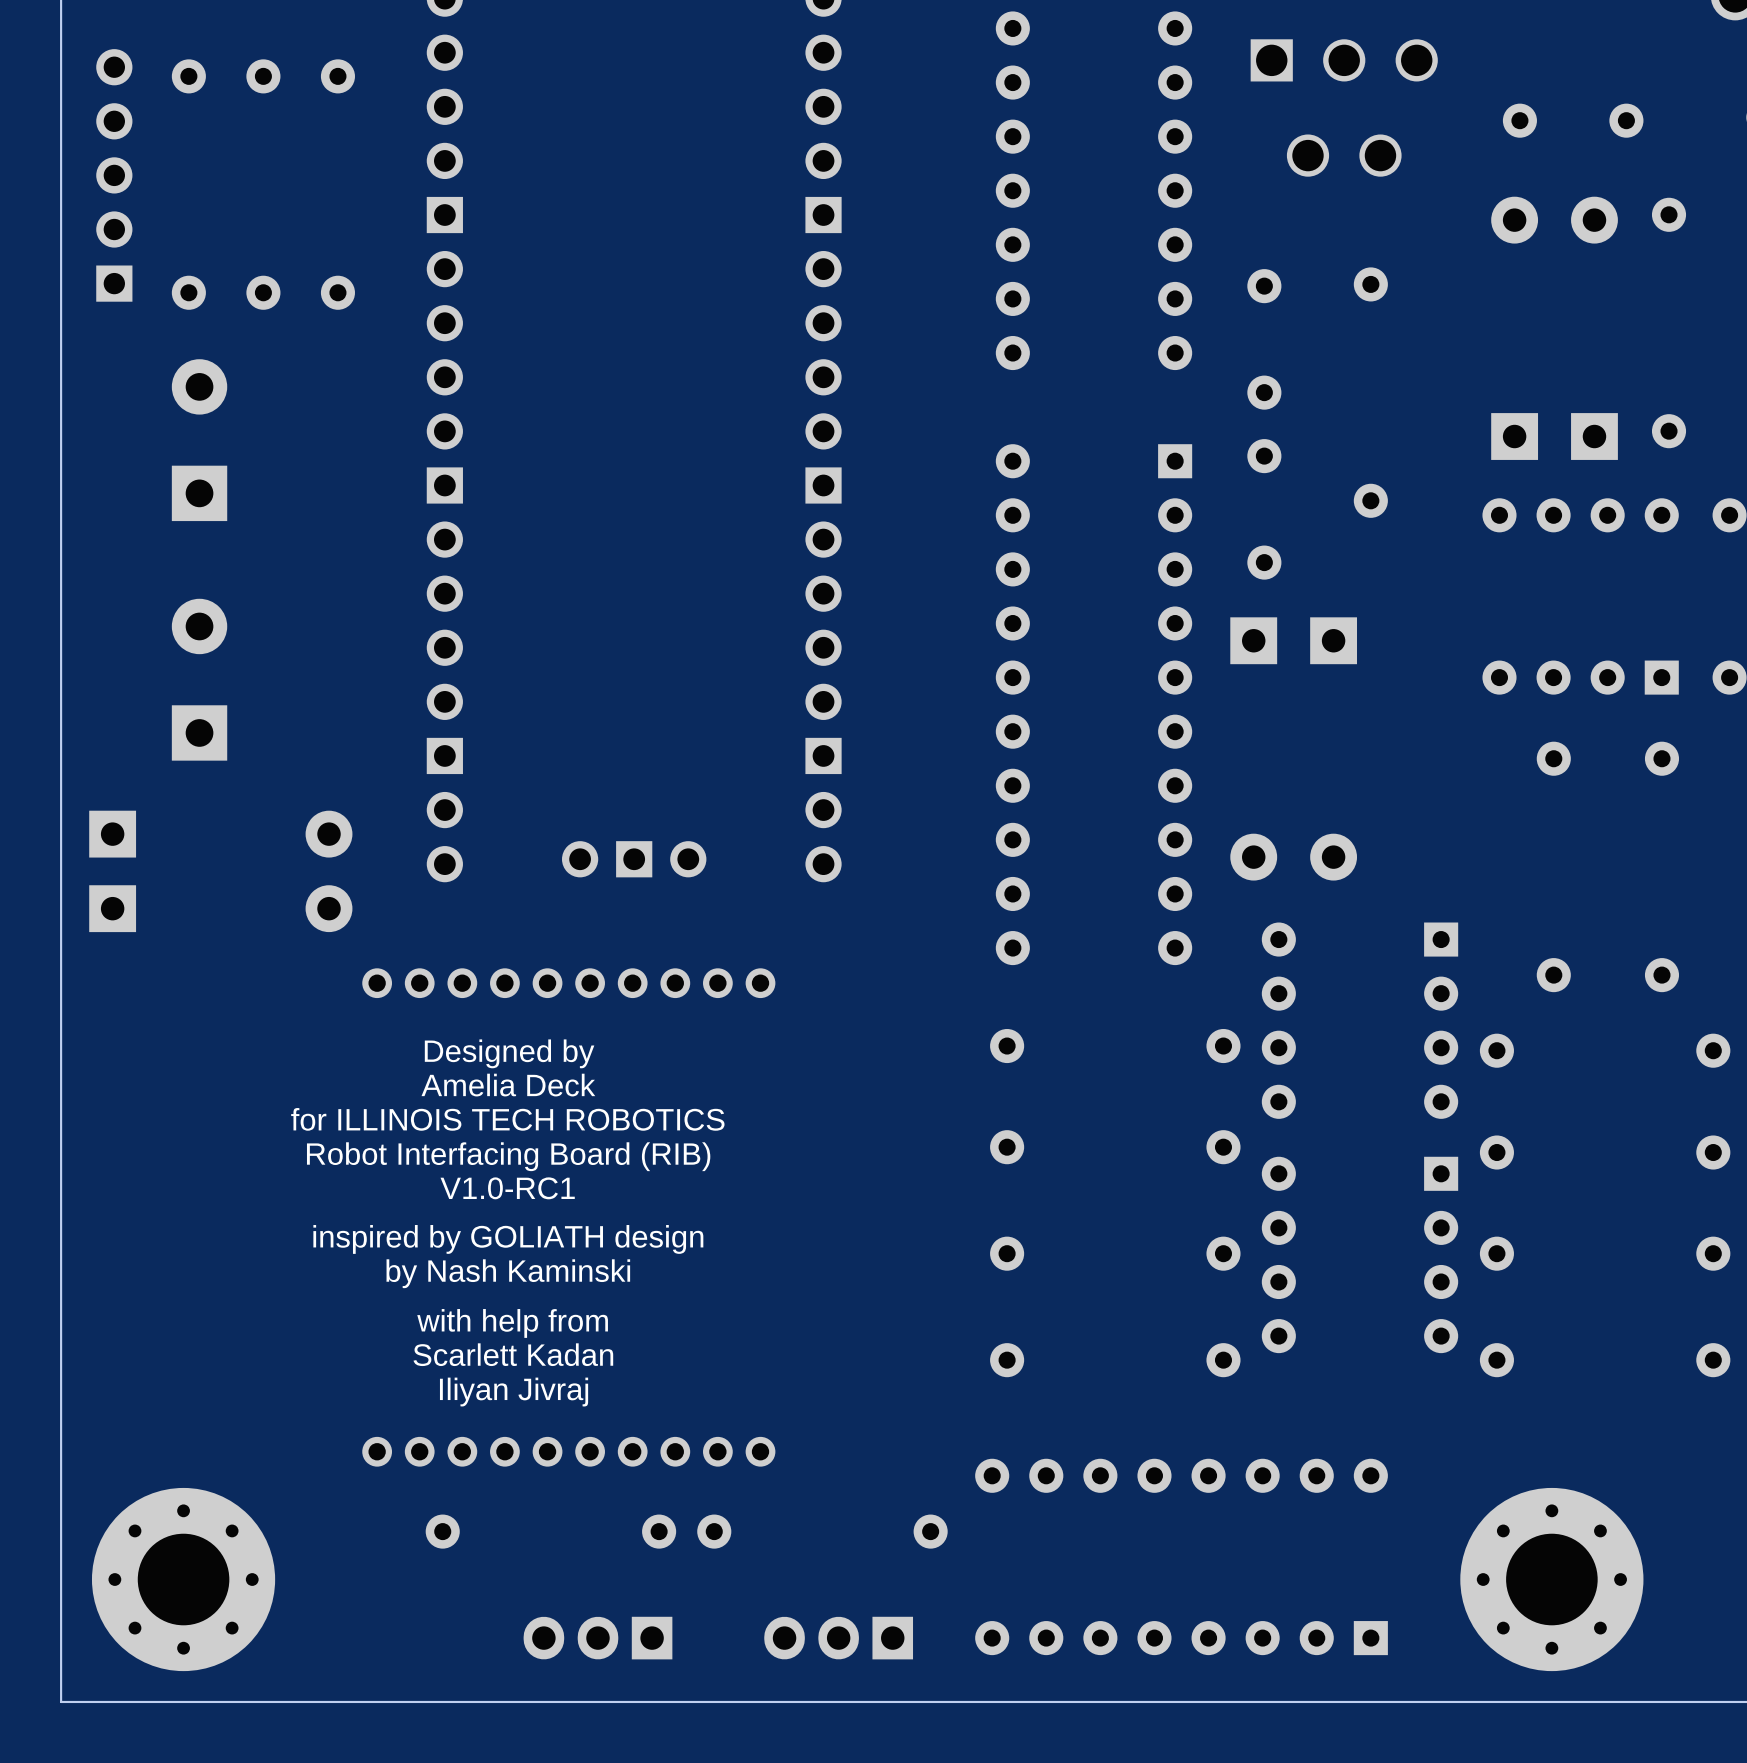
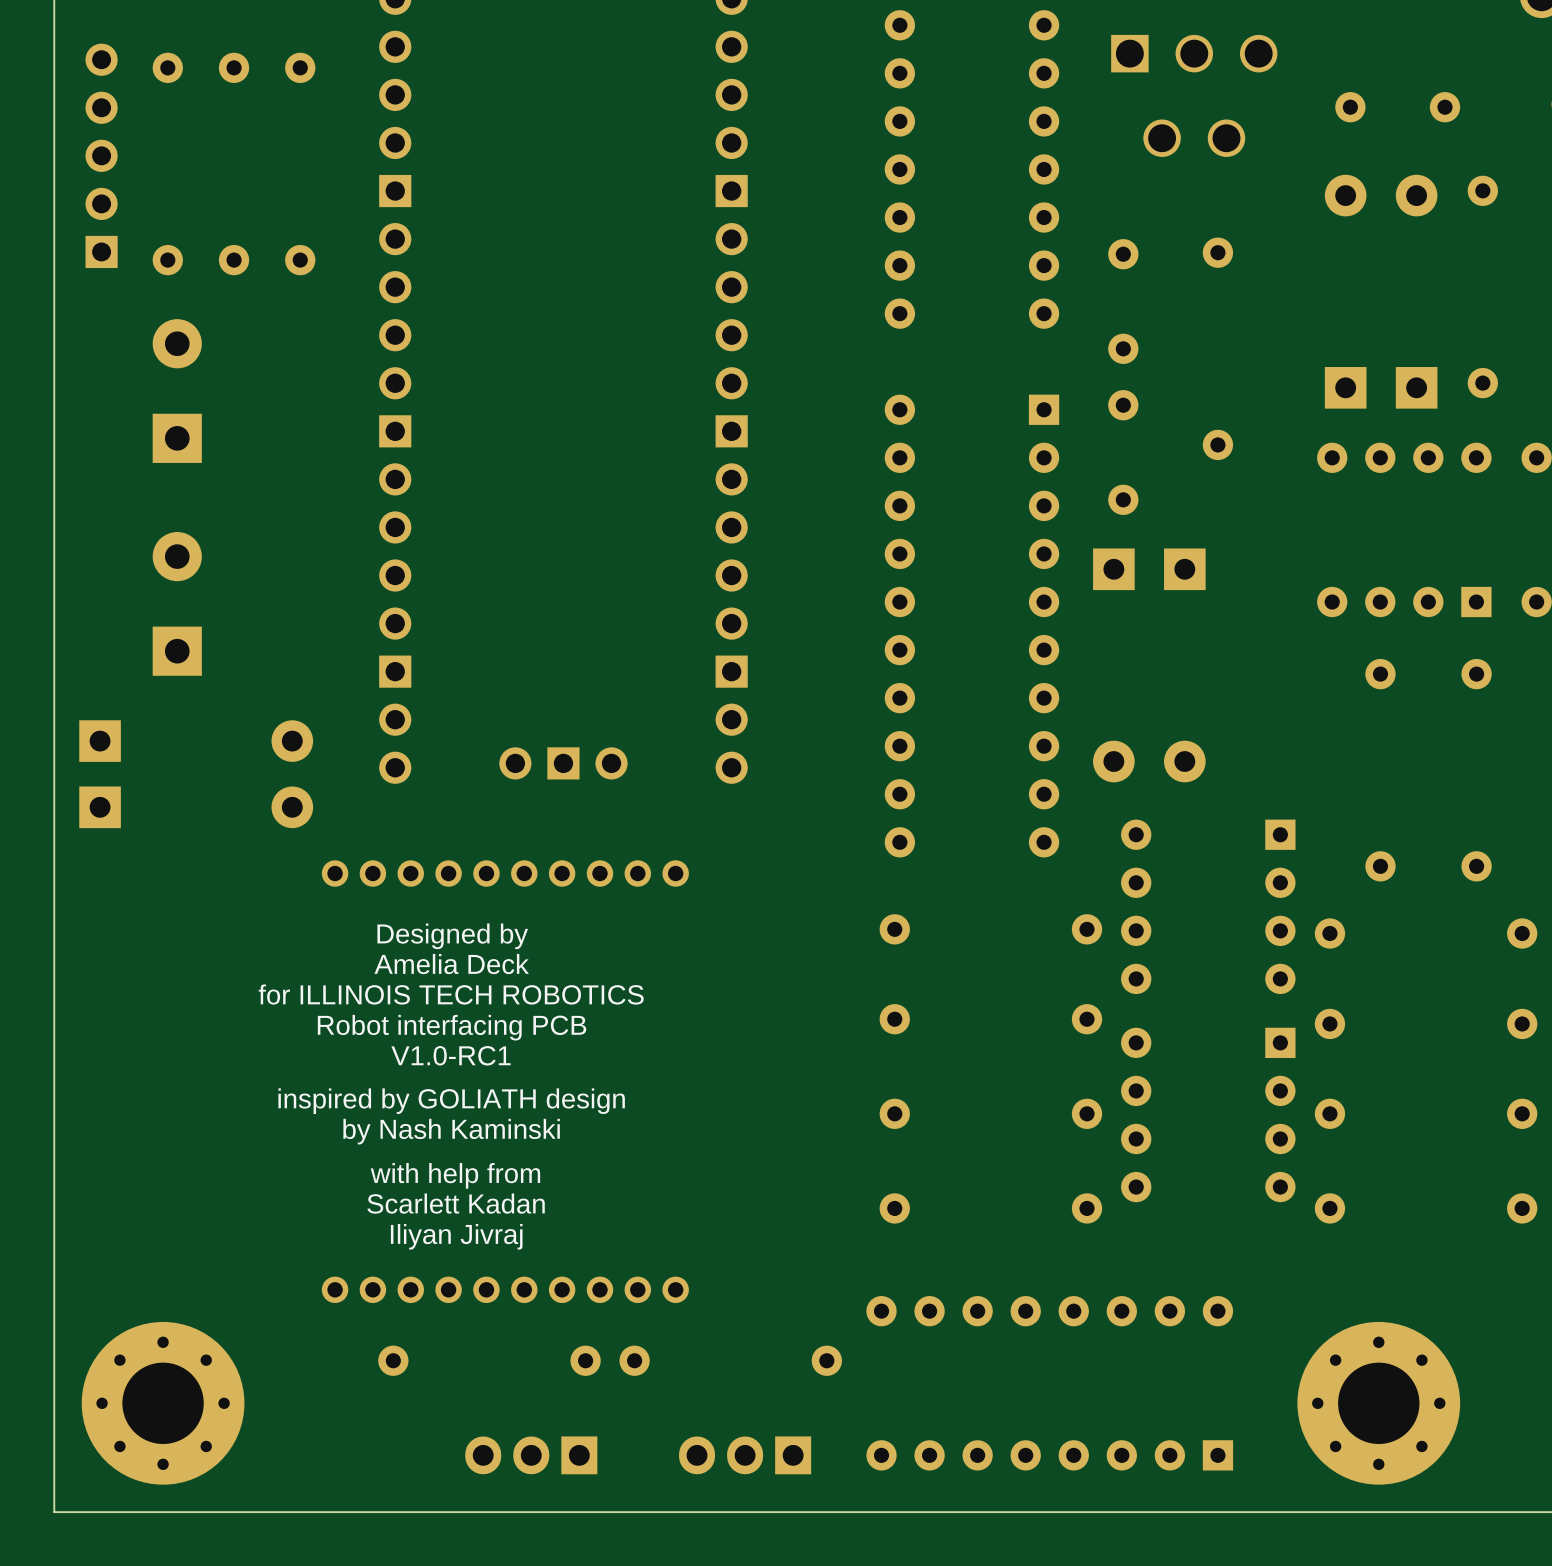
text: Robot Interfacing Board (RIB) (508, 1156) -> Robot interfacing PCB (452, 1027)

